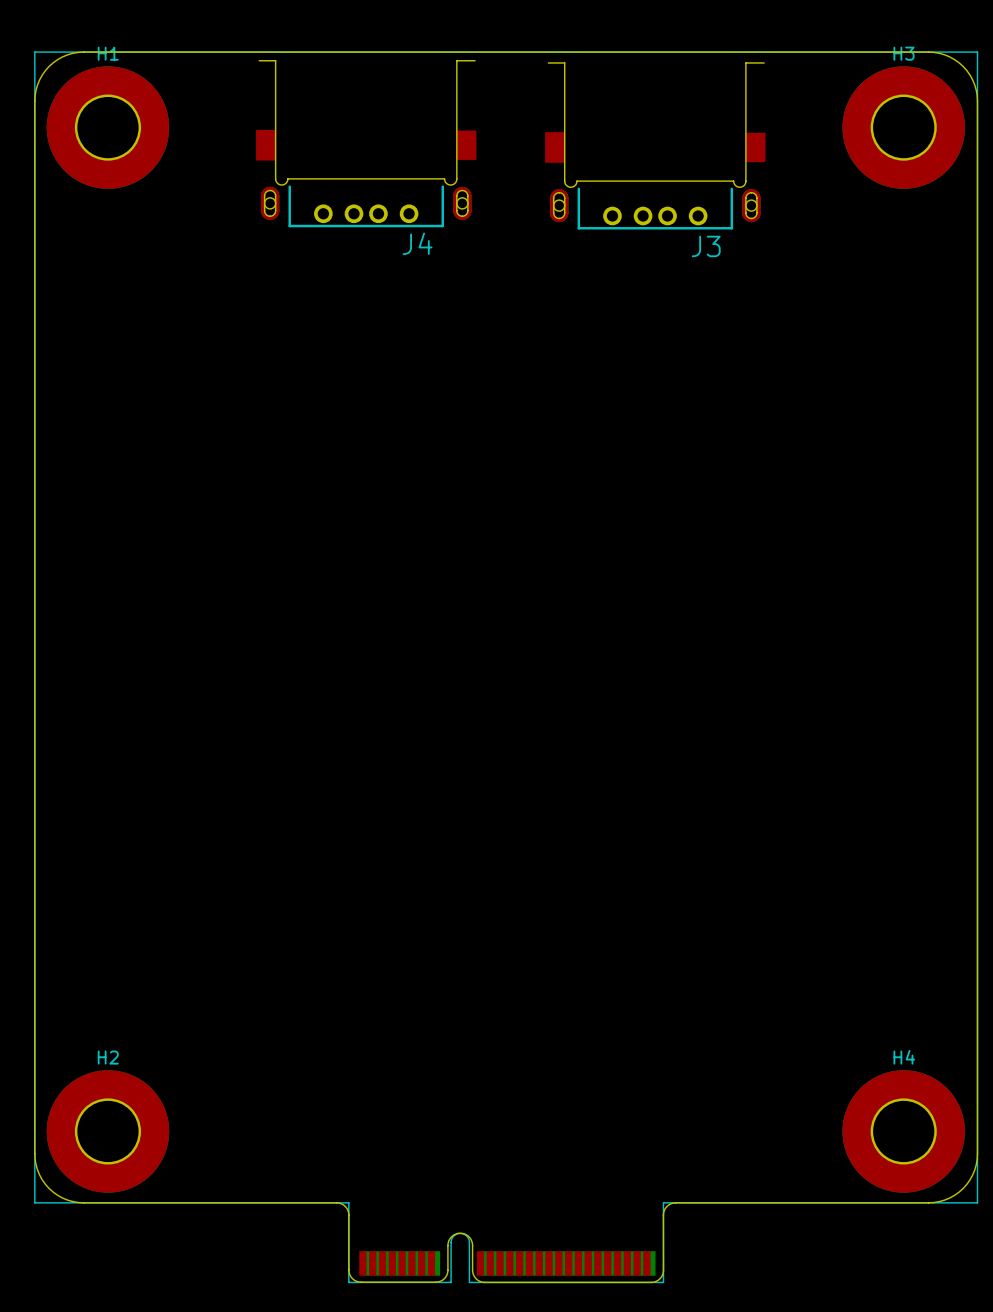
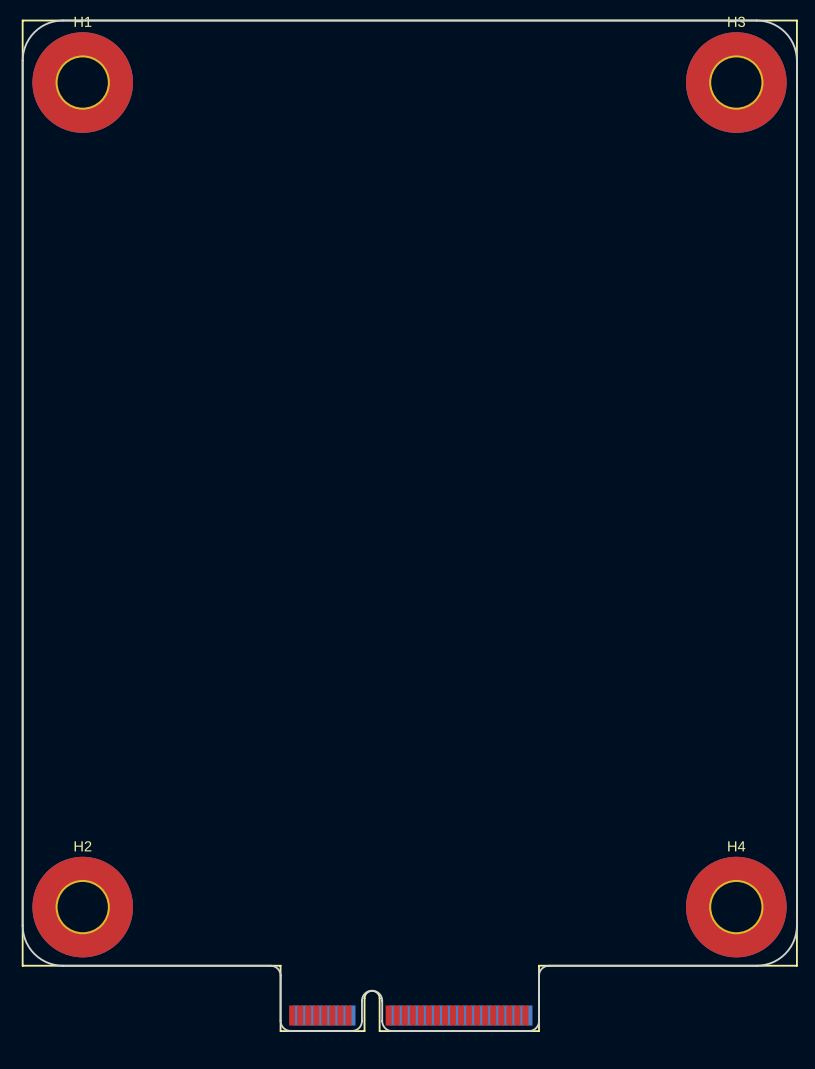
J4: (366, 143) -> none
J3: (655, 146) -> none

